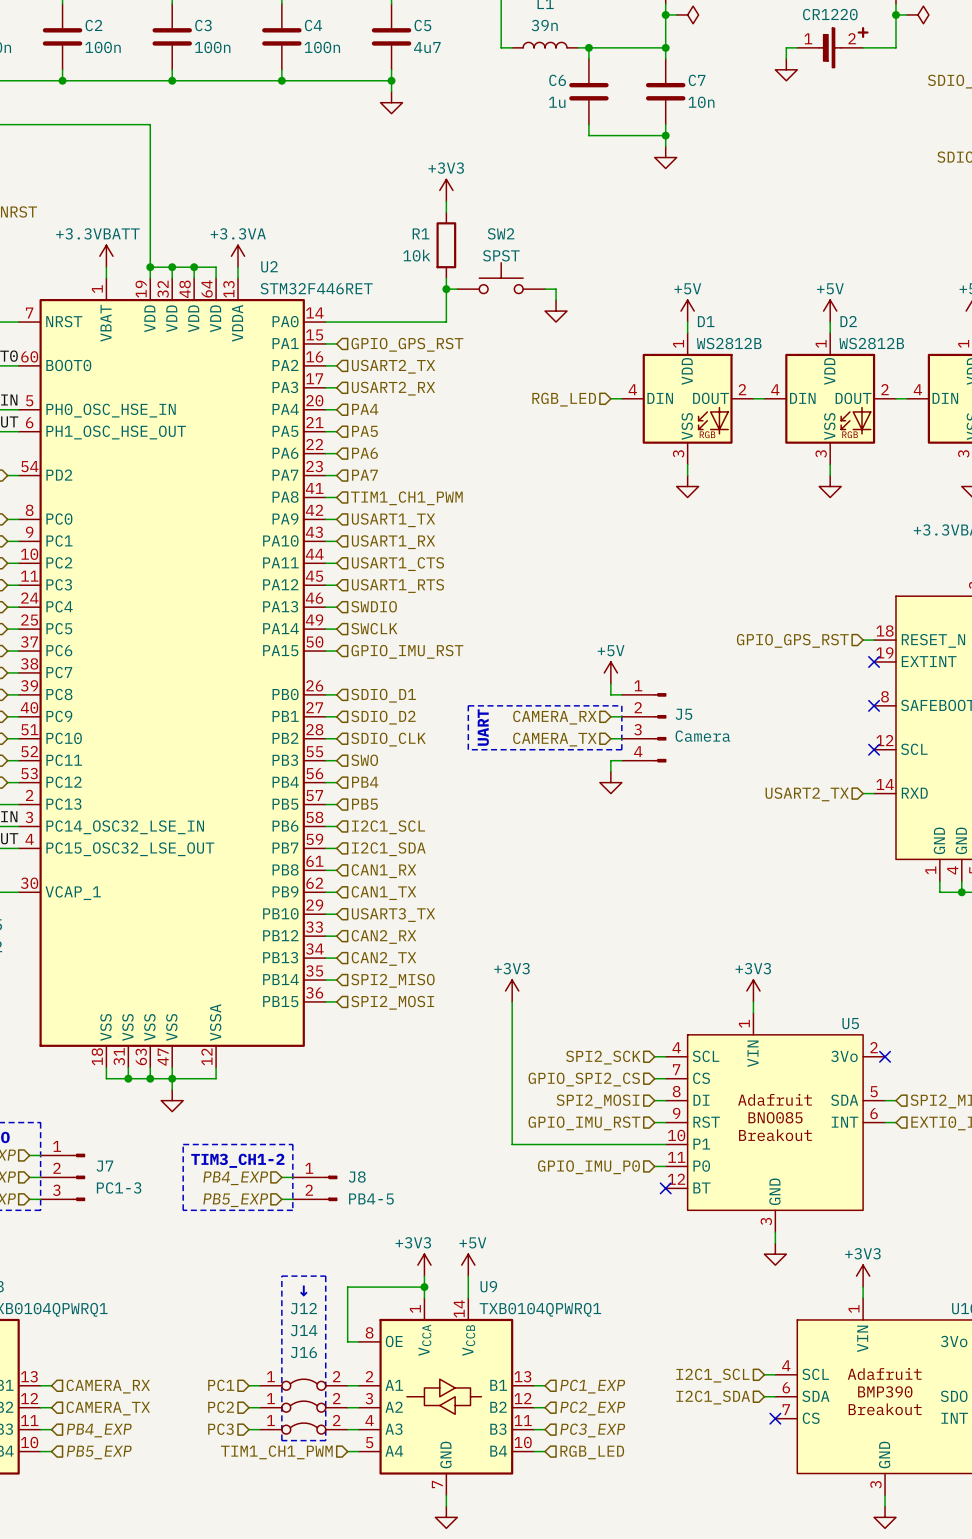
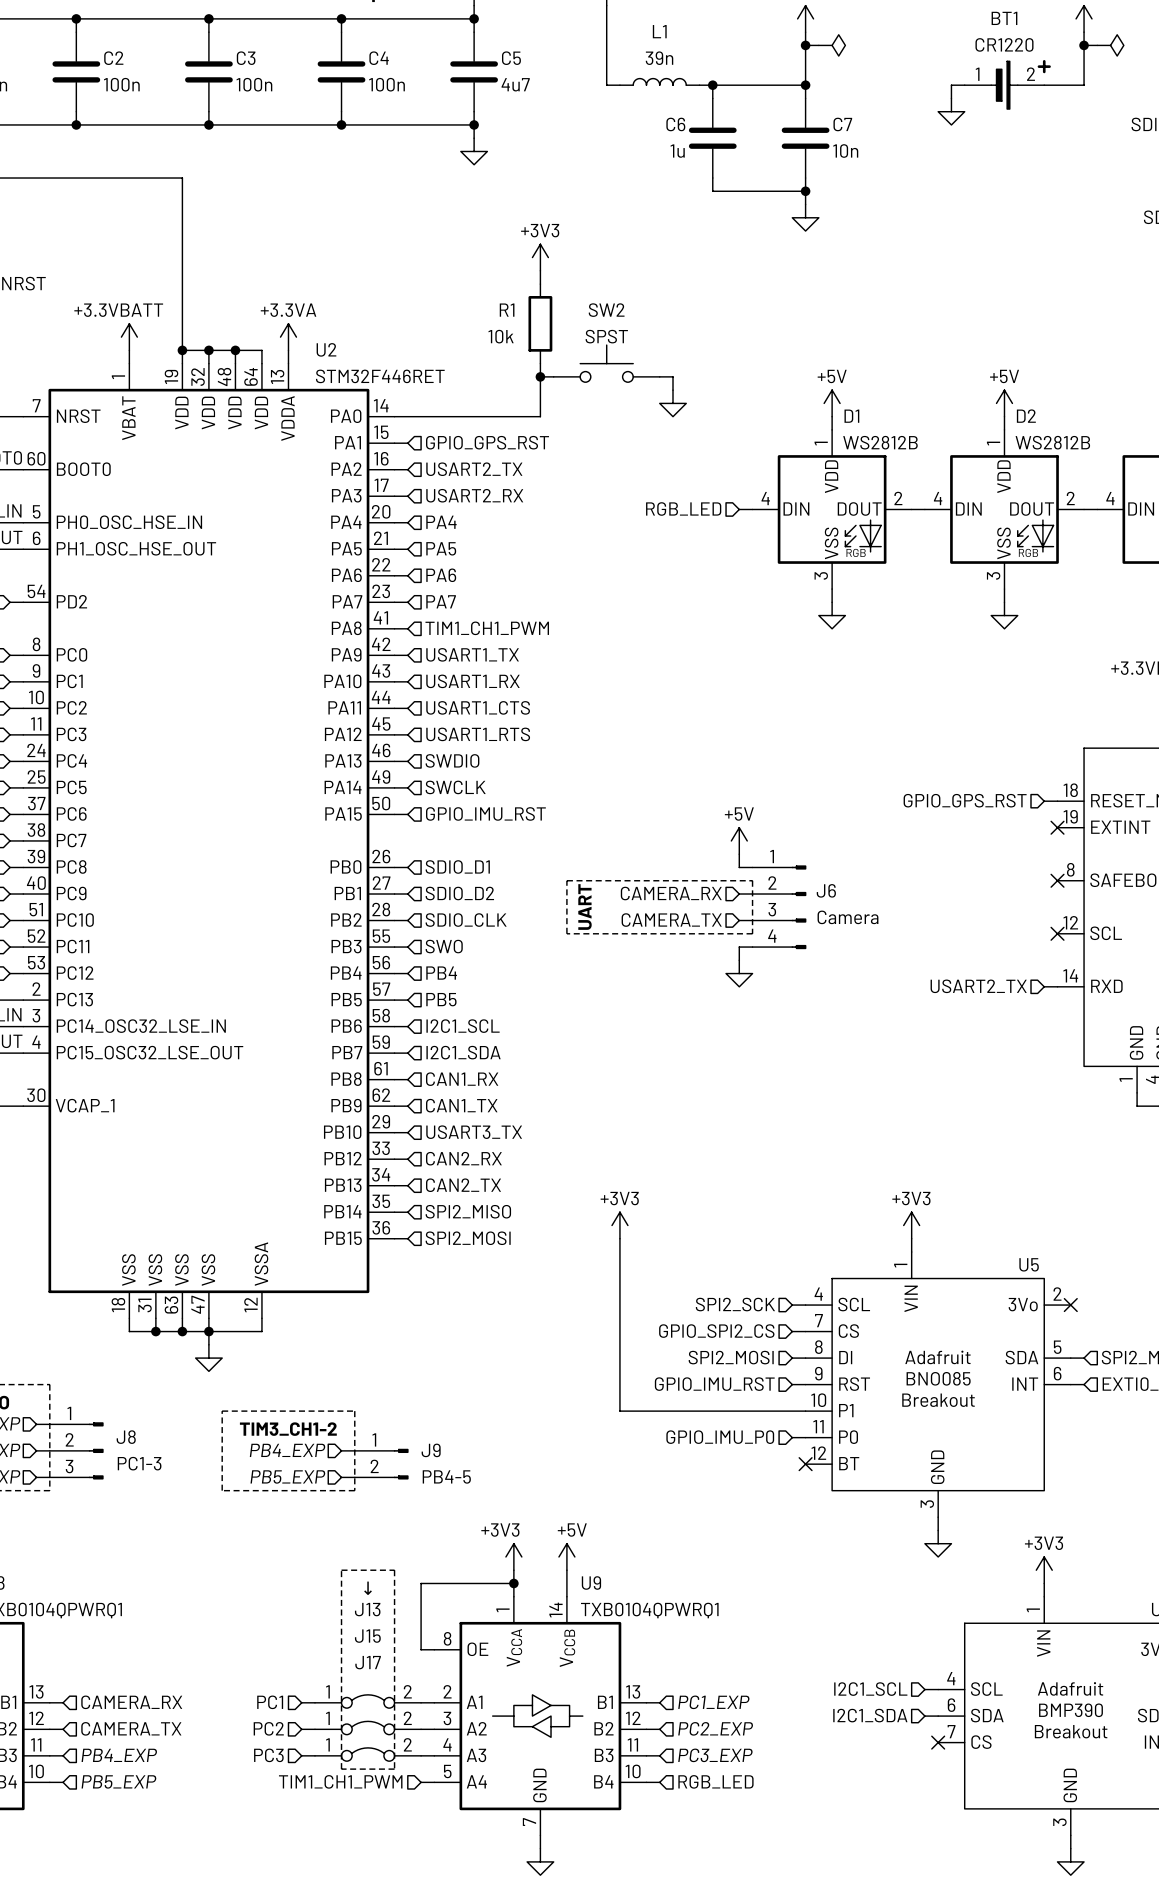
J5 name: J5 (683, 714) -> J6 (826, 890)
J7 name: J7 (104, 1166) -> J8 (126, 1437)
J8 name: J8 (357, 1177) -> J9 (431, 1450)
J12 name: J12 (303, 1308) -> J13 (367, 1609)
J14 name: J14 (304, 1330) -> J15 (367, 1636)
J16 name: J16 (303, 1352) -> J17 (368, 1662)

